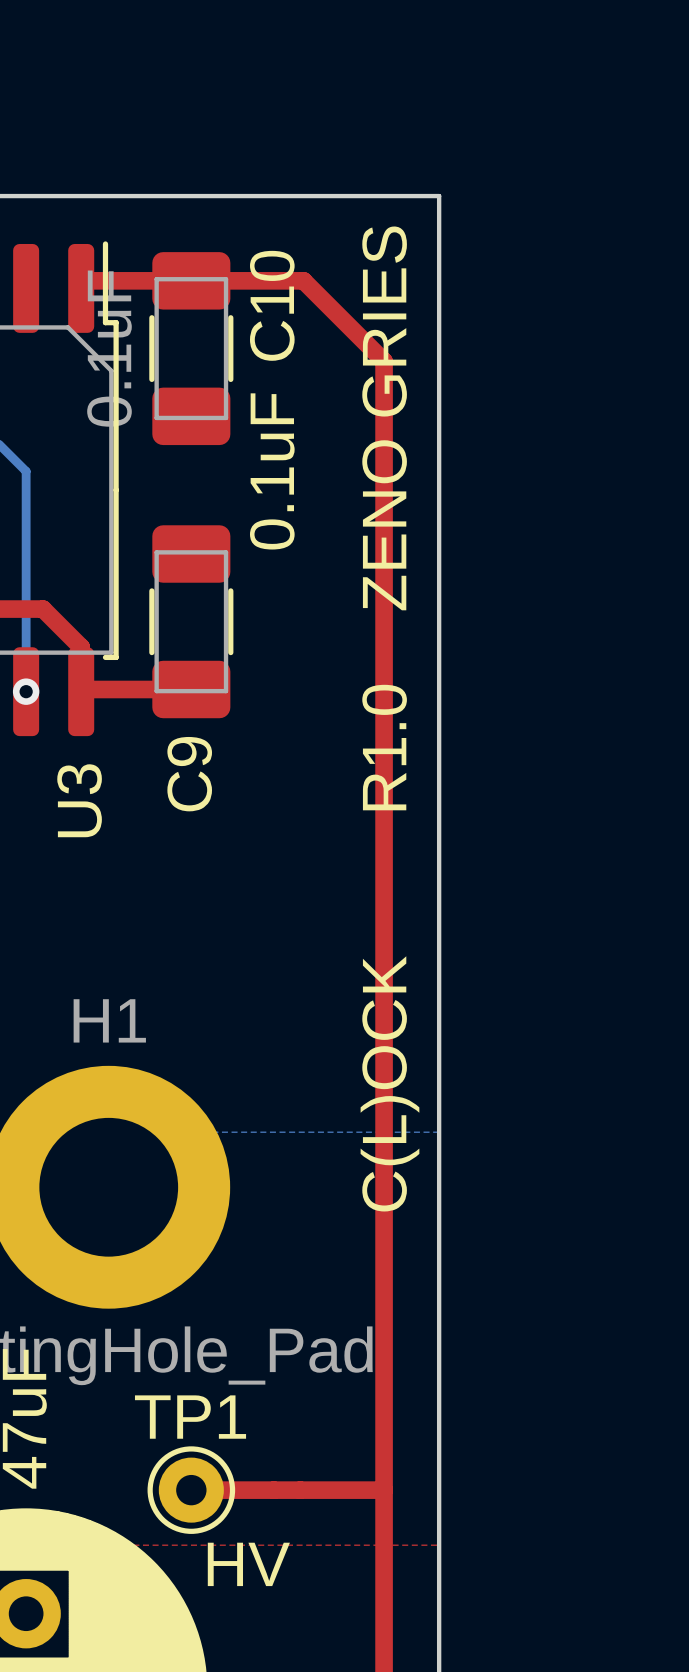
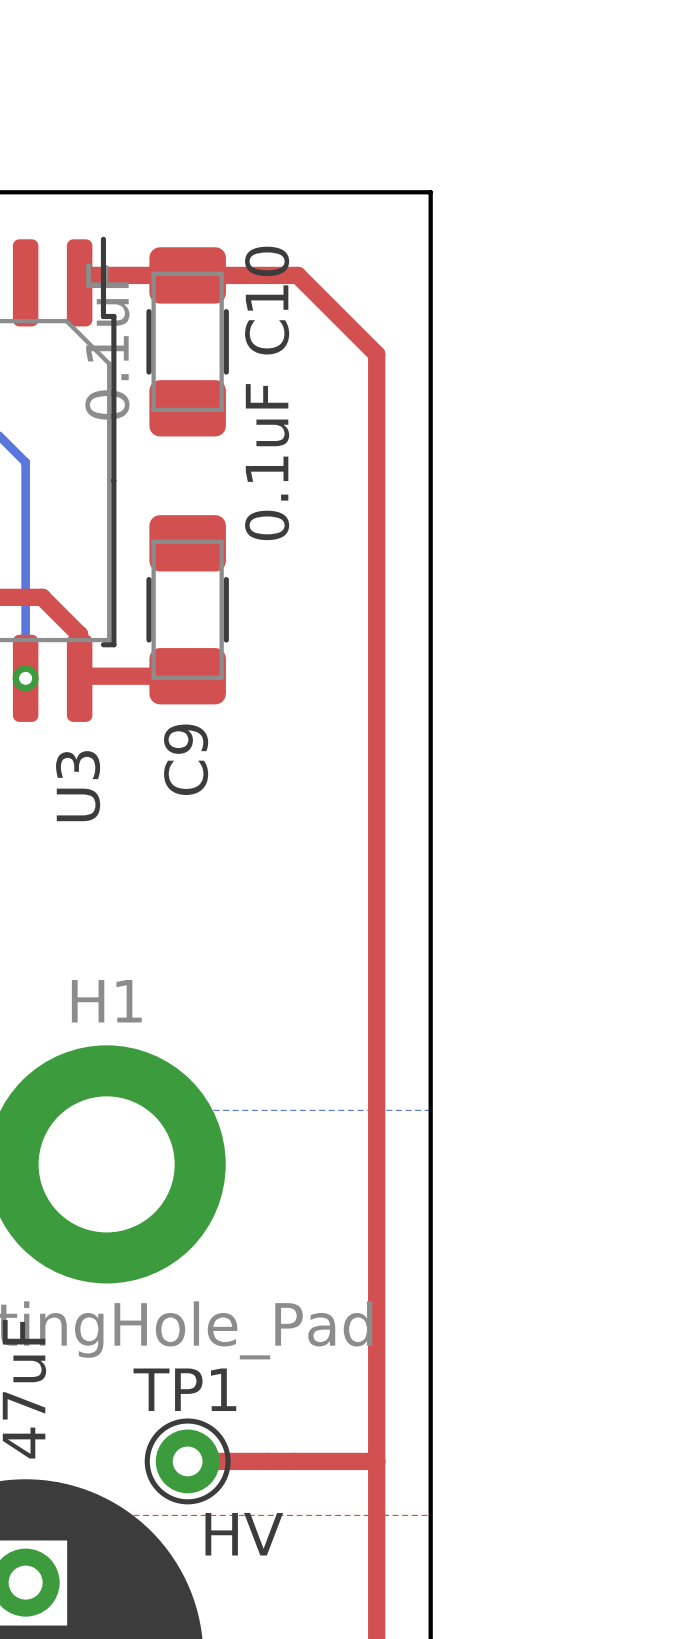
text: C(L)OCK R1.0 ZENO GRIES (389, 718) -> none

